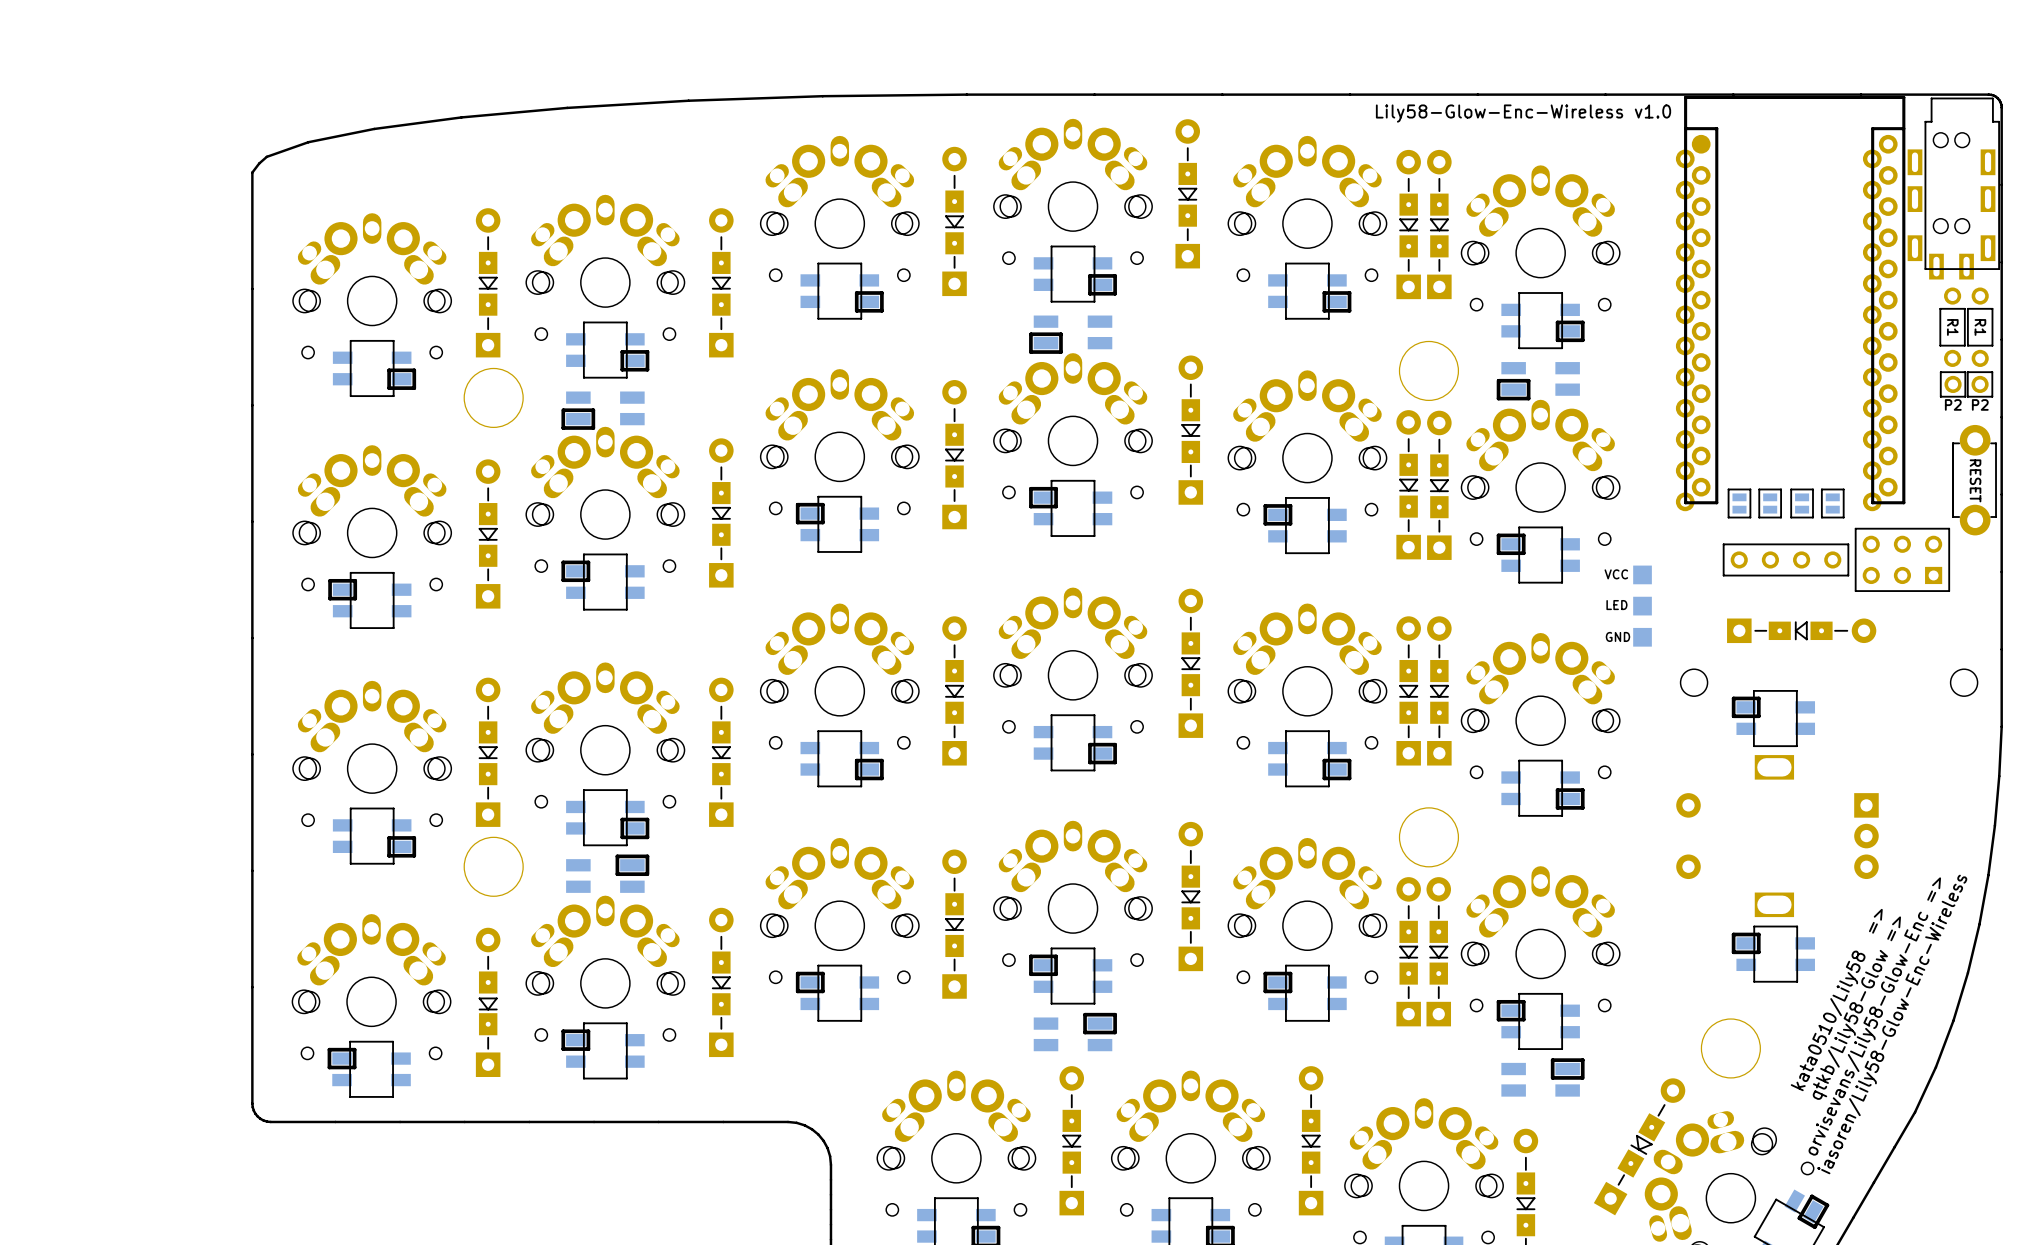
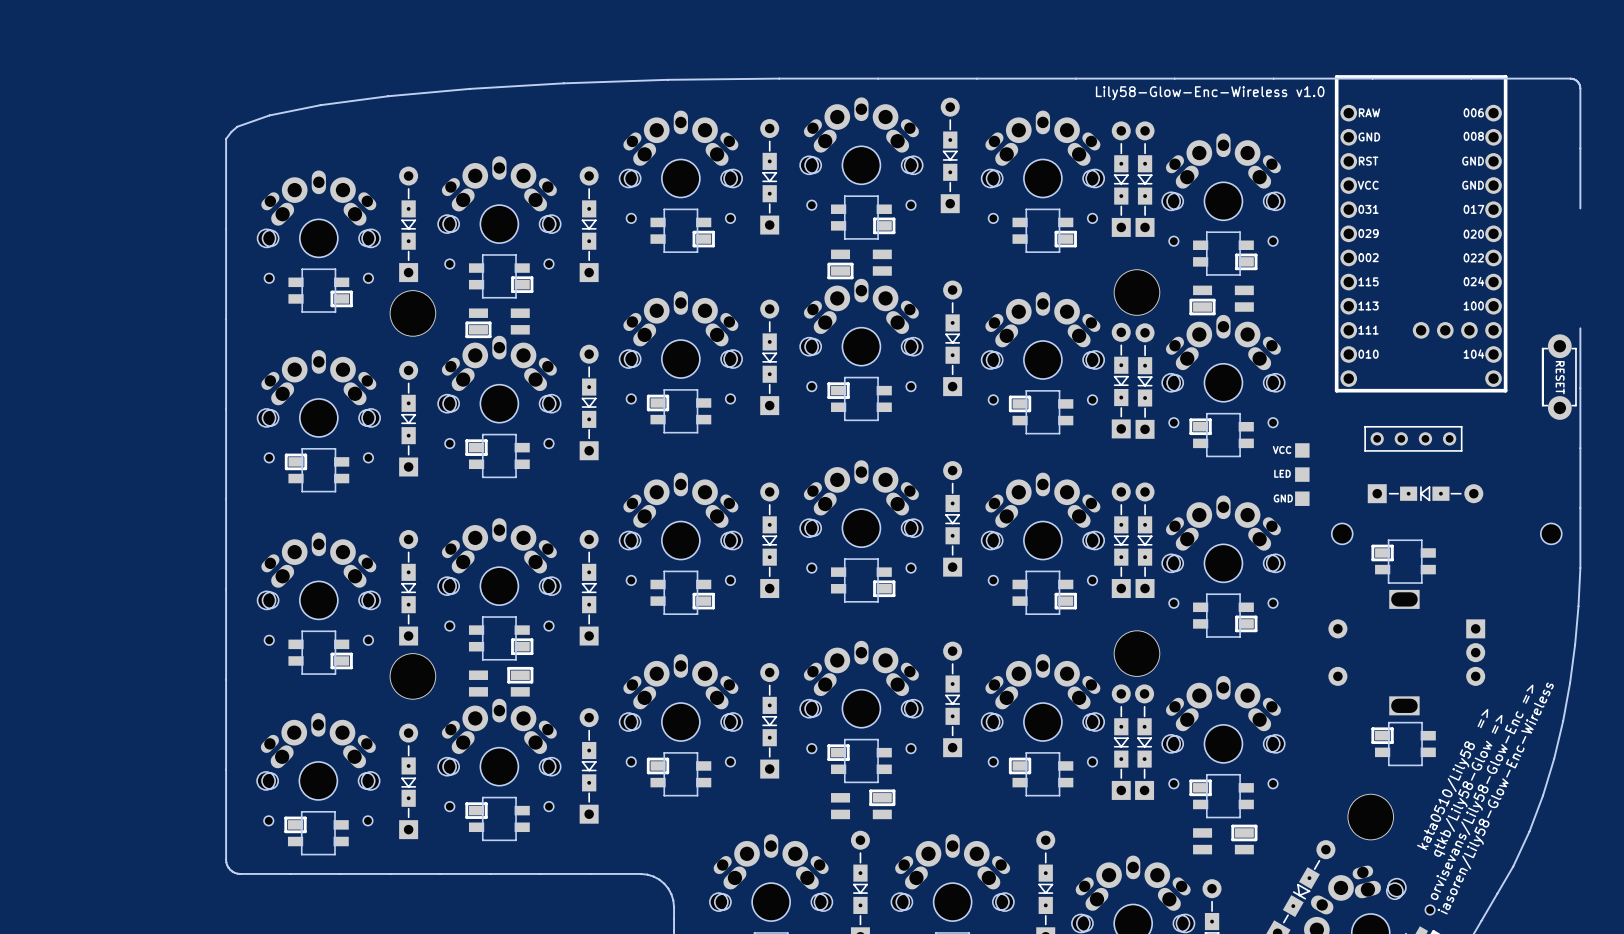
part footprint: [1675, 95, 1906, 512] -> [1334, 75, 1508, 393]
part: (1953, 188) -> none
board edge: (2001, 262) (2001, 417) -> none
part: (1952, 327) -> none
part: (1980, 327) -> none
part: (1953, 384) -> none
part: (1980, 384) -> none
part: (1739, 503) -> none
part: (1770, 503) -> none
part: (1802, 503) -> none
part: (1832, 503) -> none
part: (1902, 559) -> none

